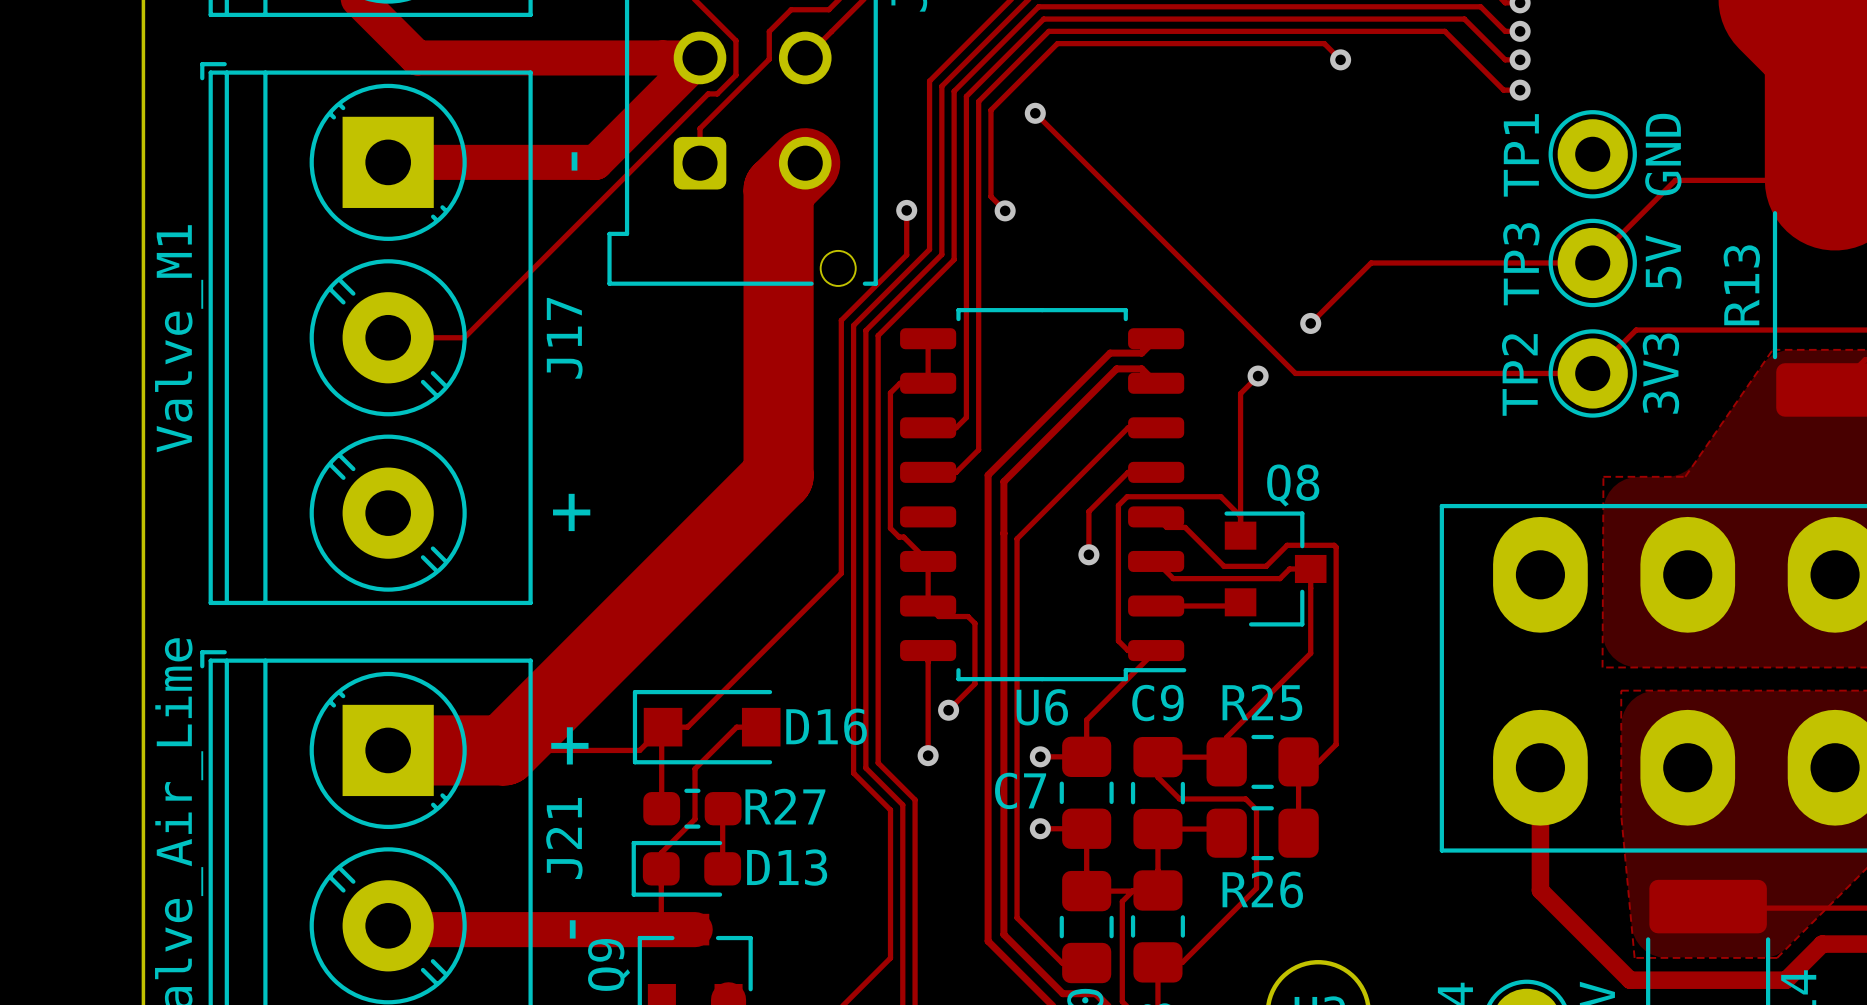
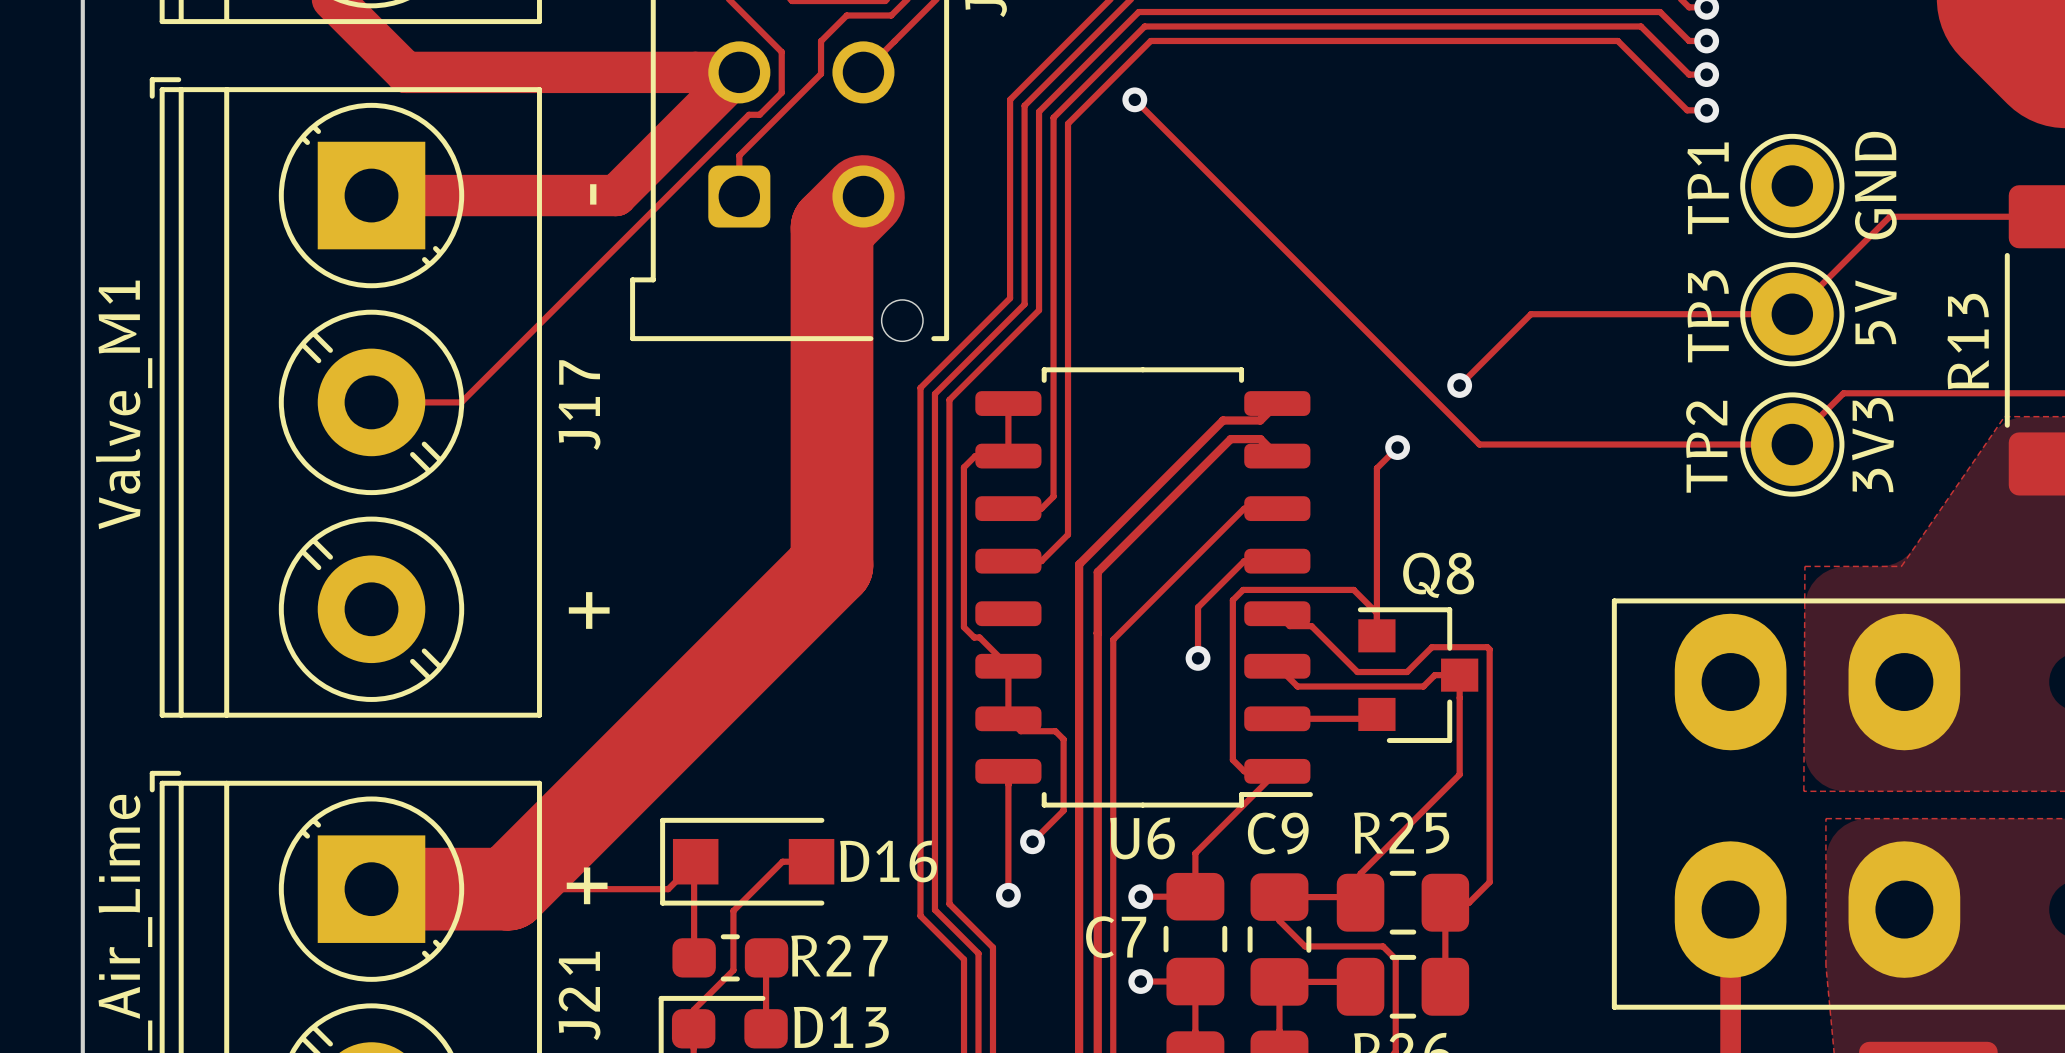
track: (1340, 59) (1324, 43) (1057, 43) (990, 110) (990, 196) (1005, 211) -> none
via: (1340, 59) -> none
track: (1035, 113) (1295, 373) (1327, 373) -> (1134, 99) (1479, 444)
via position: (1035, 113) -> (1134, 99)
track: (906, 210) (906, 255) (841, 320) (841, 573) (687, 727) (663, 727) -> none
via: (906, 210) -> none
via: (1005, 210) -> none

